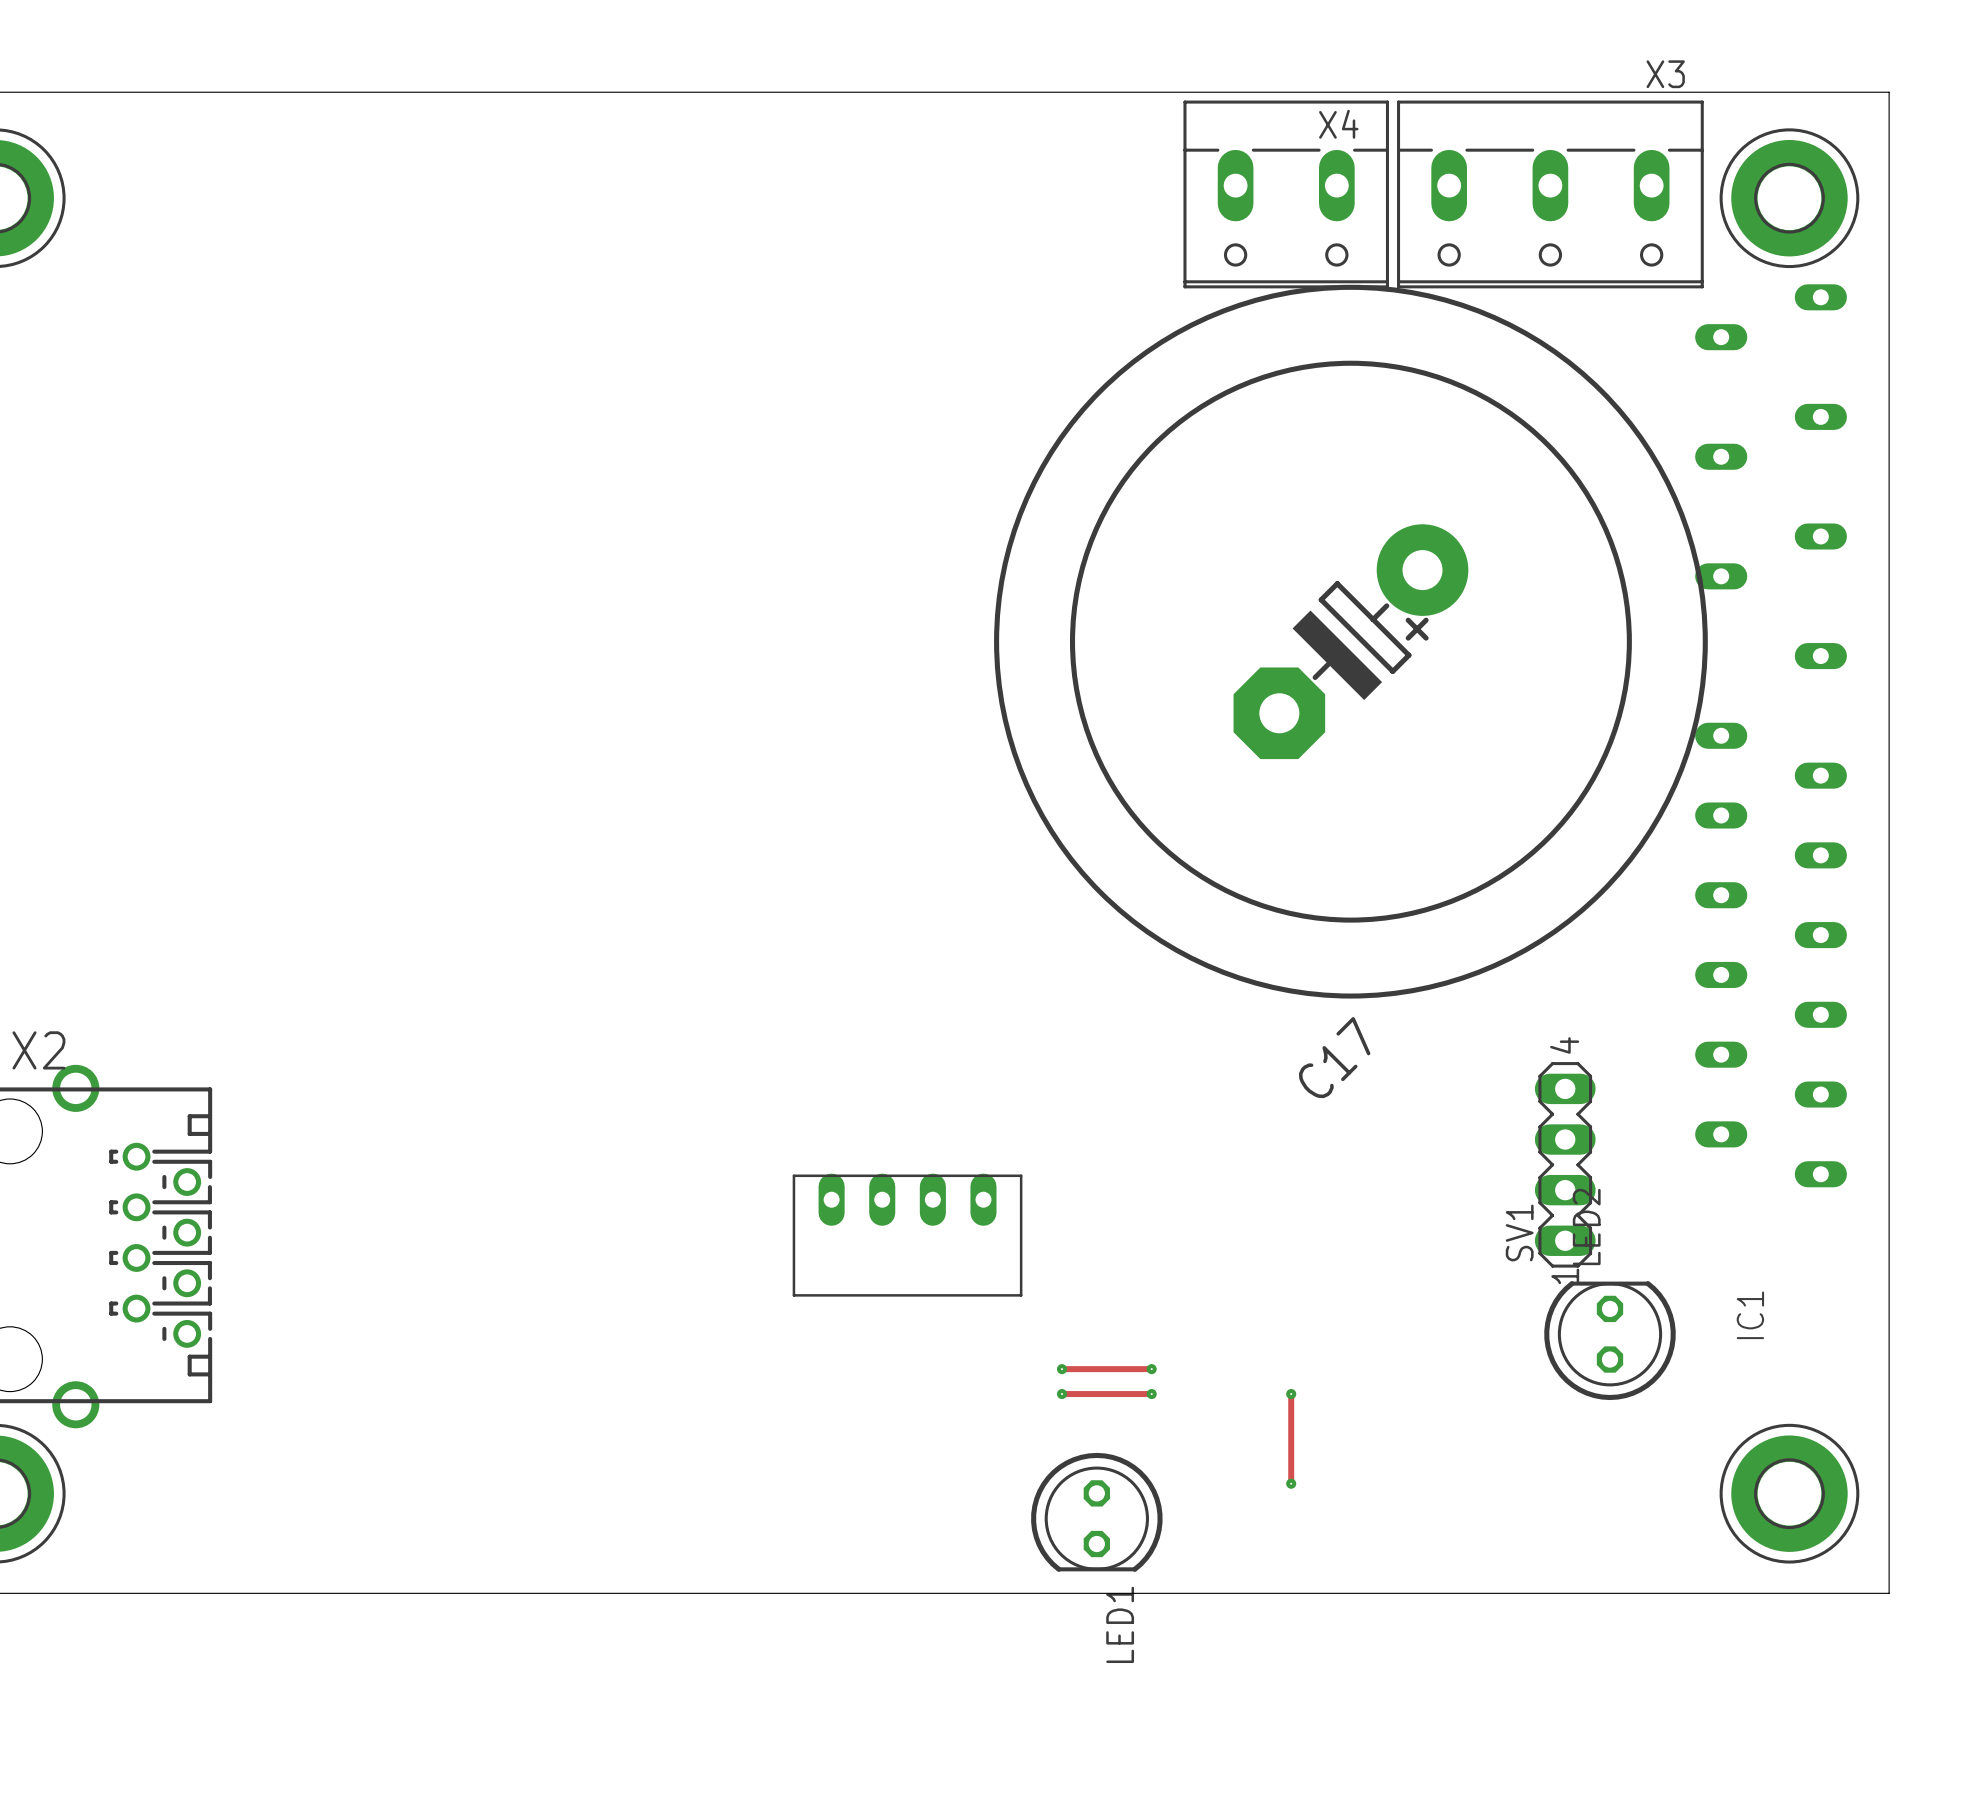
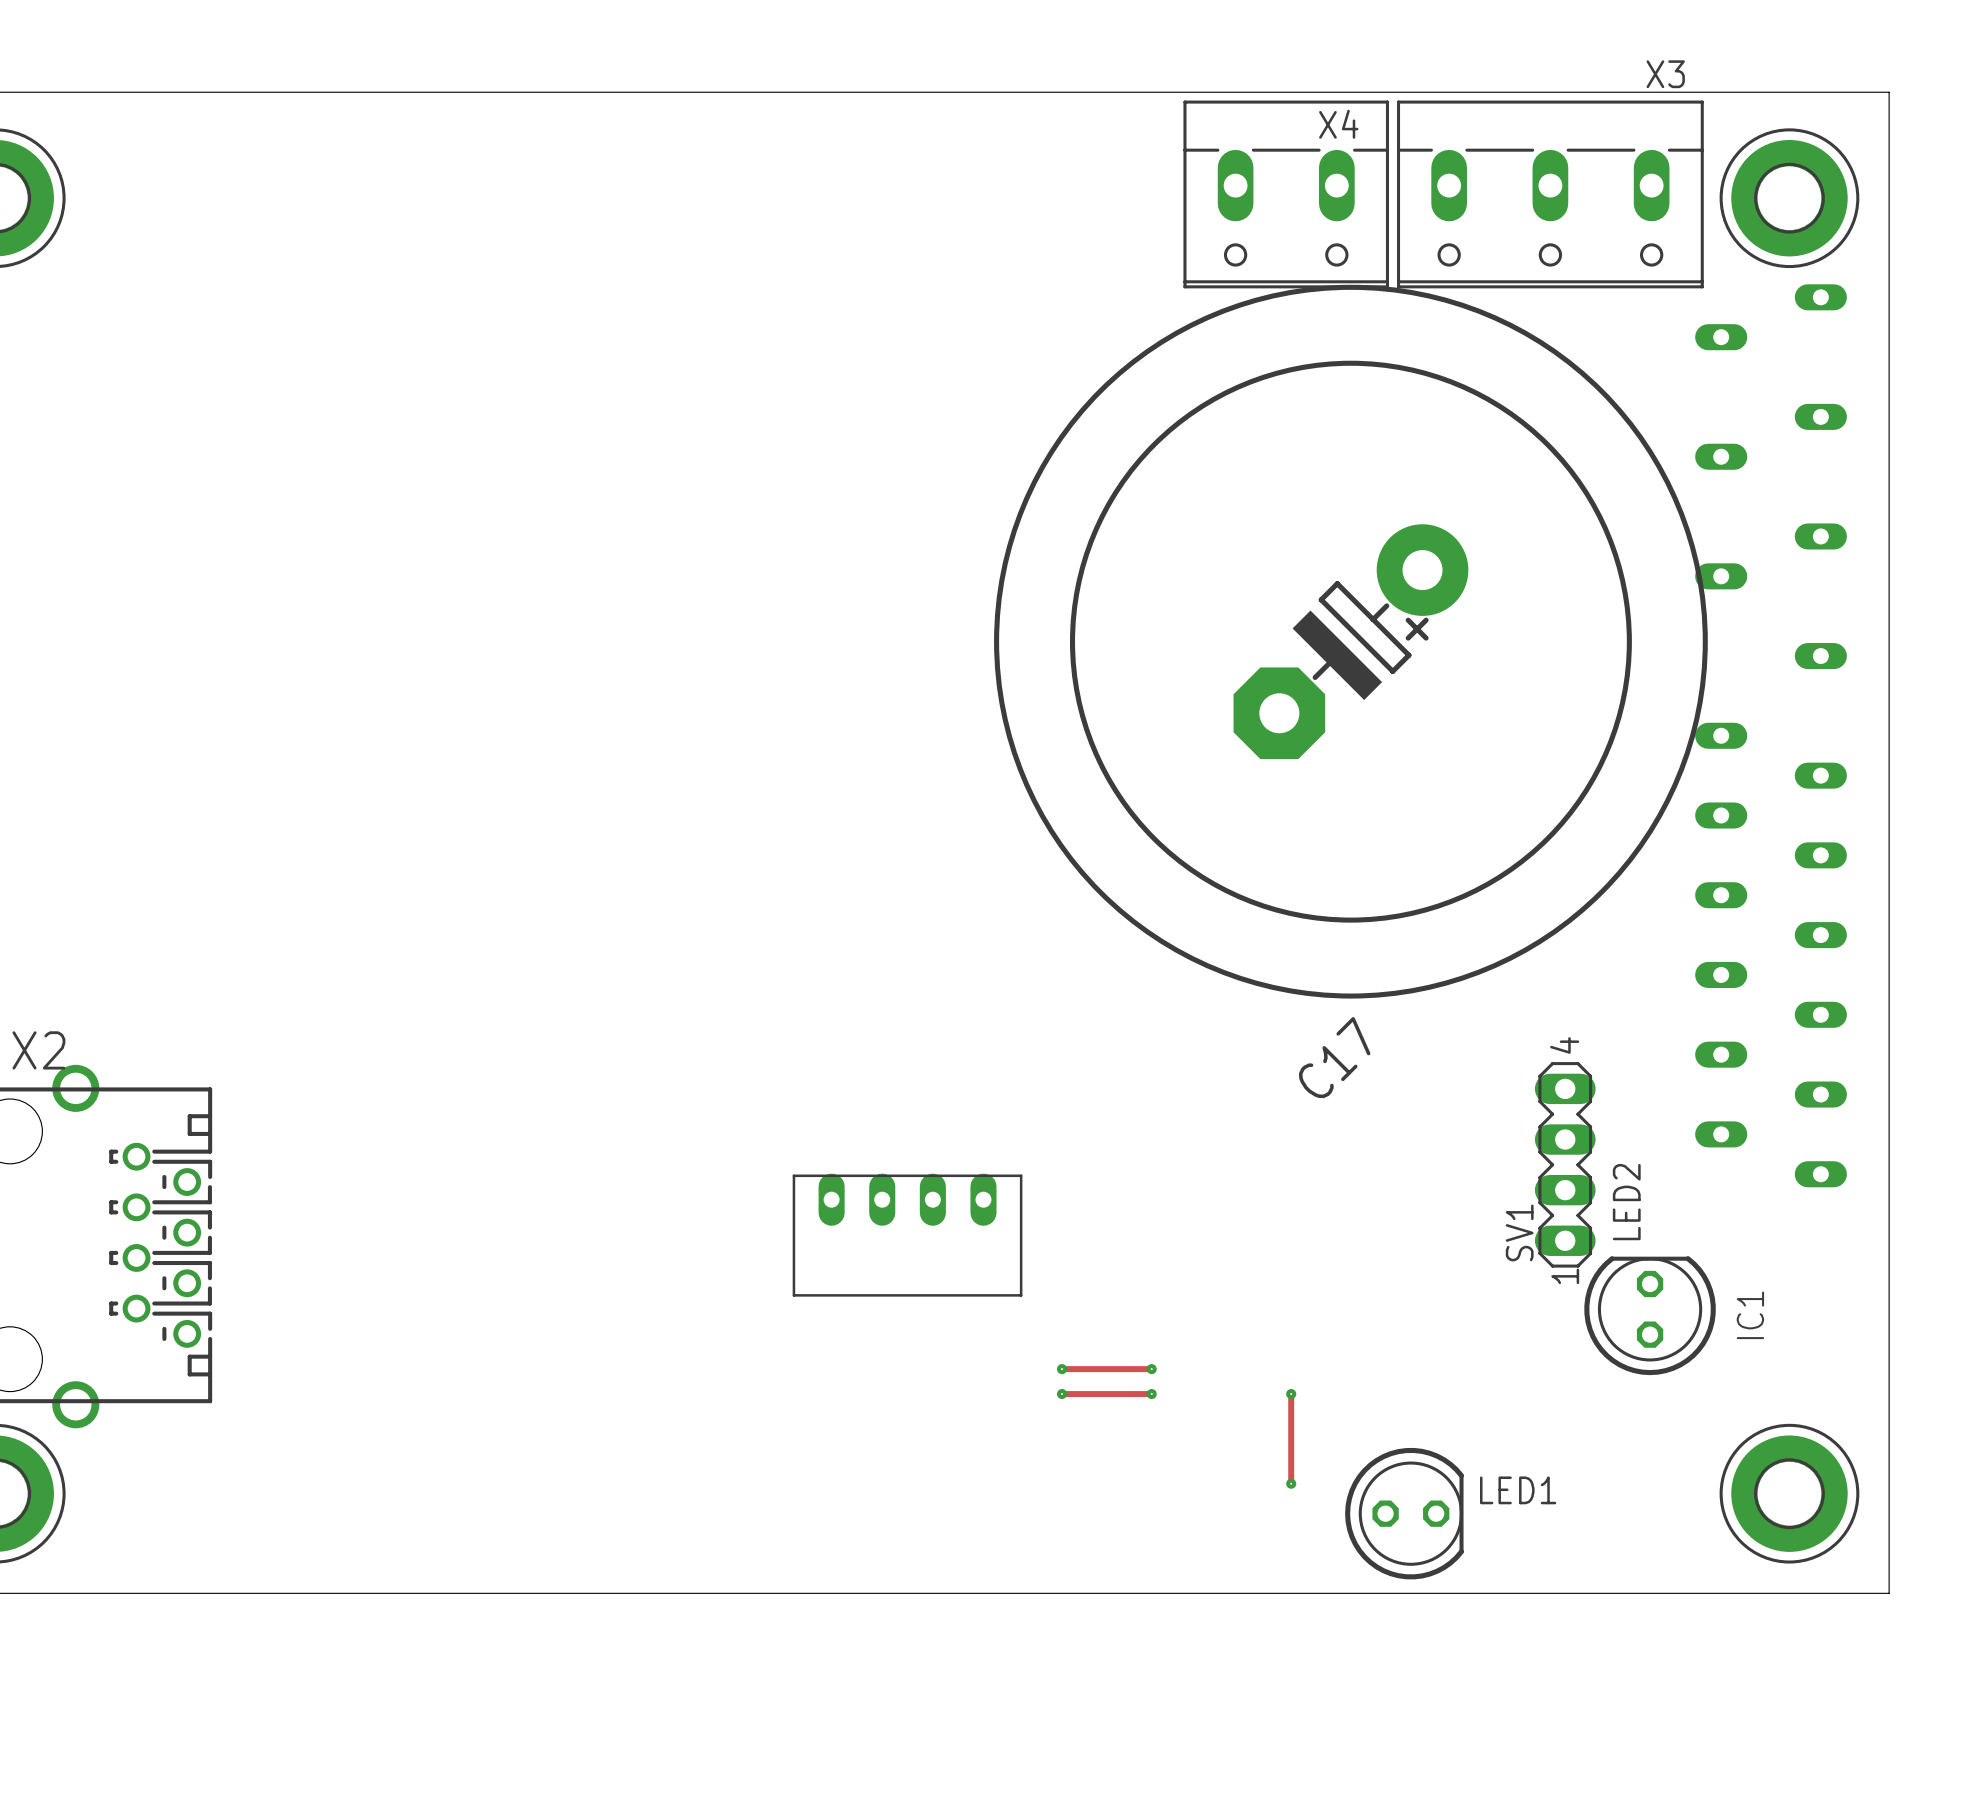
LED2 position: (1609, 1340) -> (1650, 1315)
LED1 rotation: 0° (1096, 1512) -> 90° counterclockwise (1404, 1513)
LED1 position: (1096, 1512) -> (1404, 1513)

